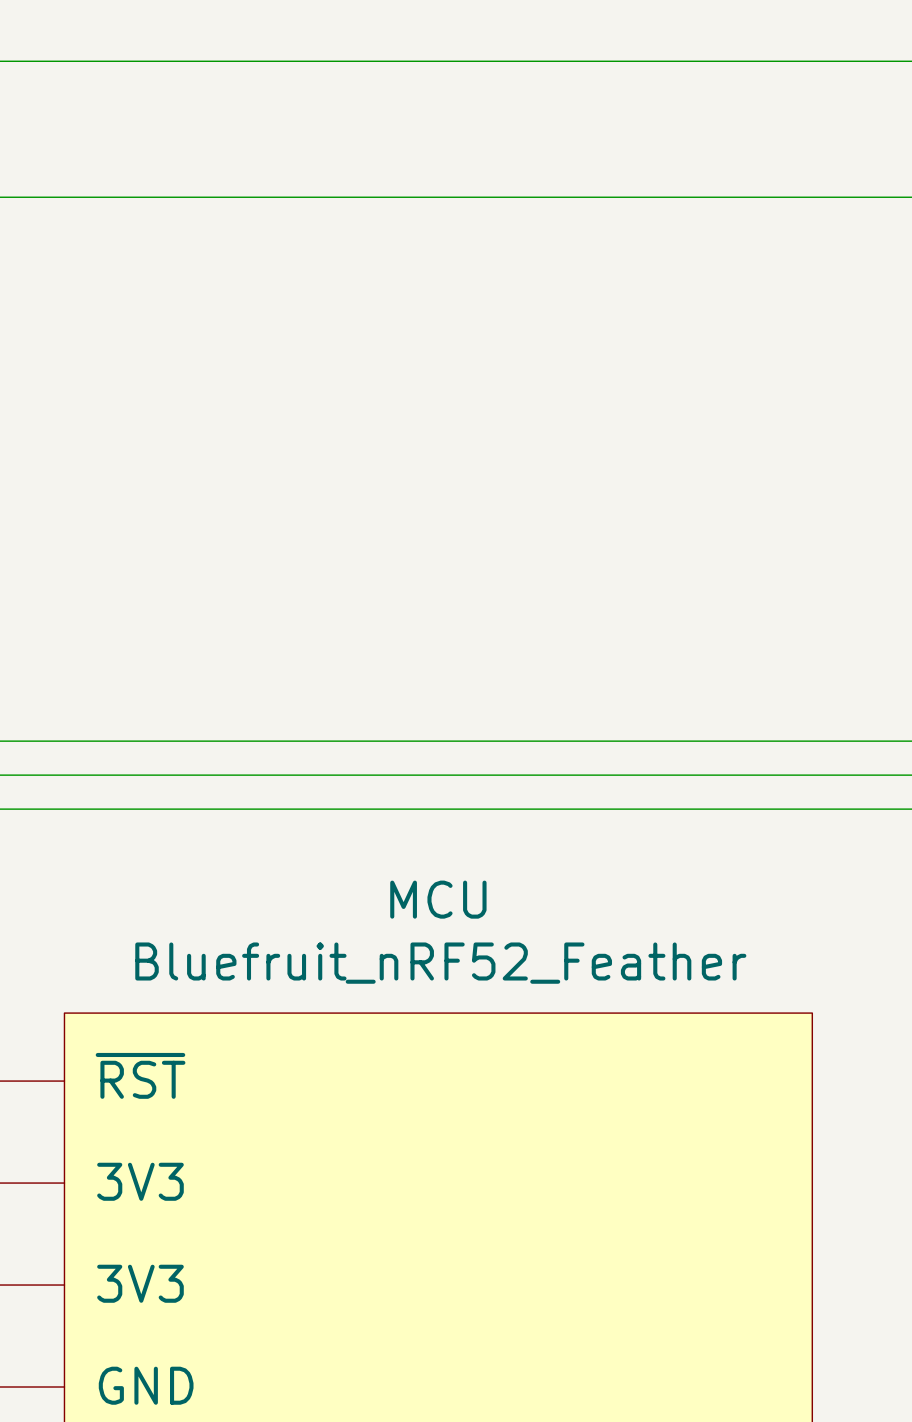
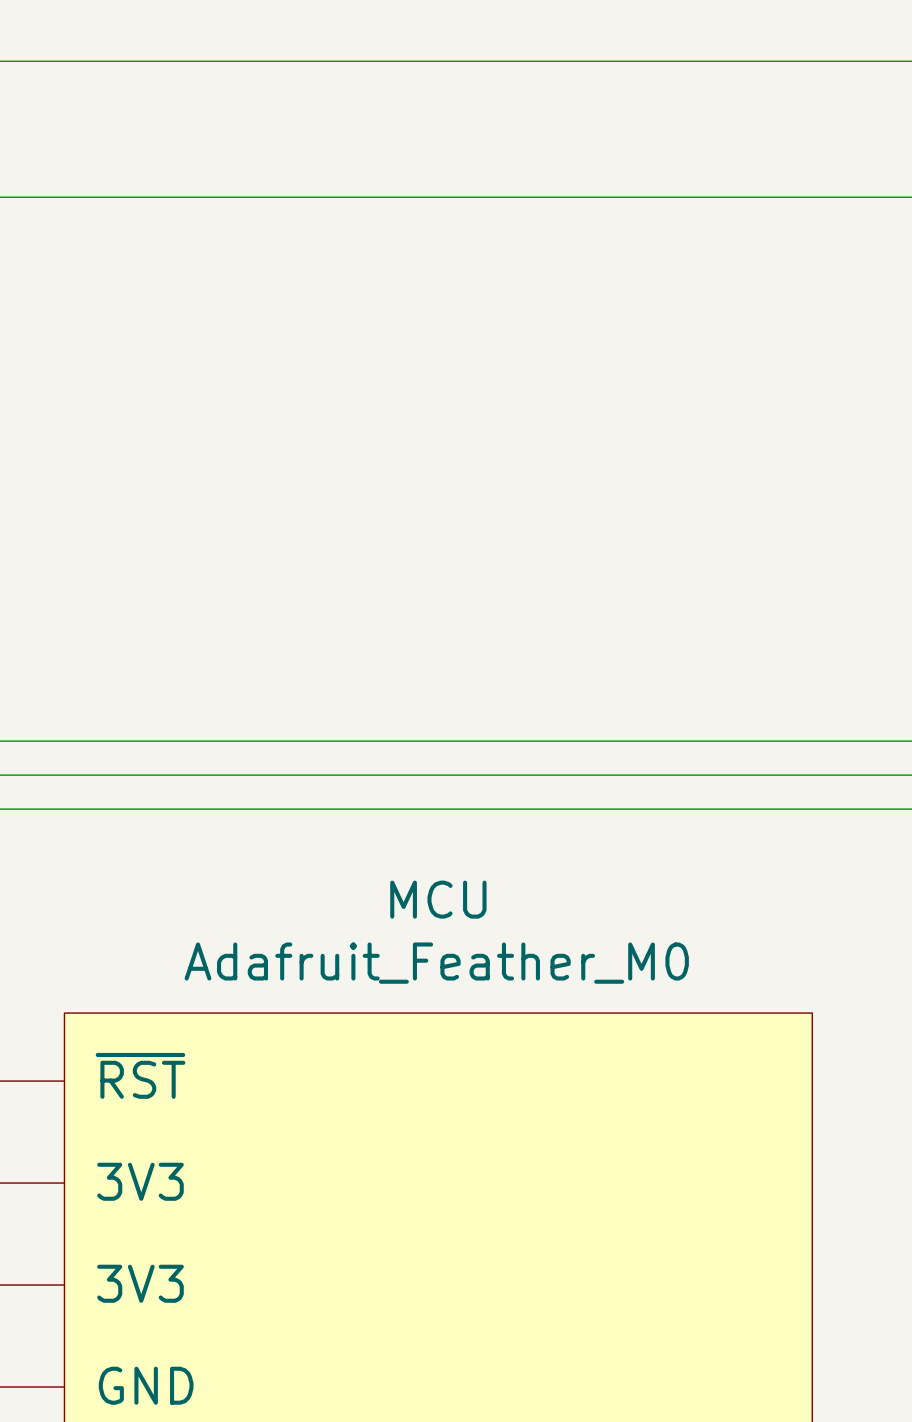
MCU value: Bluefruit_nRF52_Feather (440, 963) -> Adafruit_Feather_M0 (436, 963)

